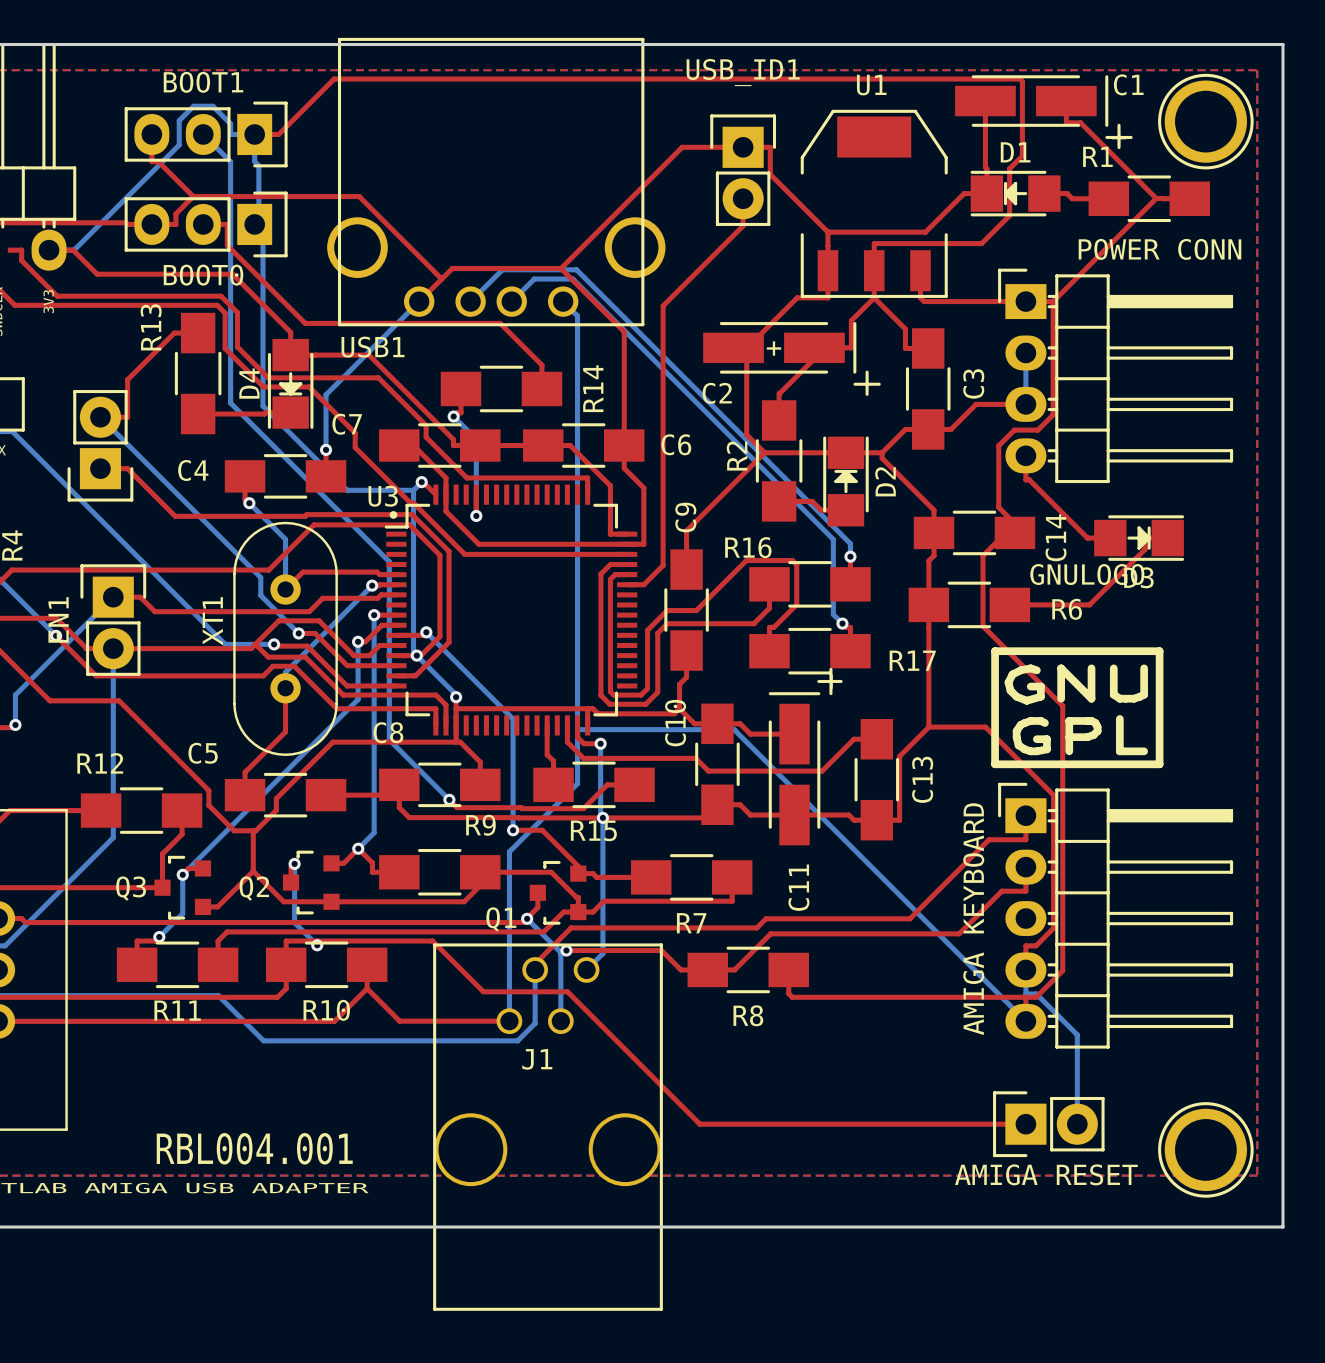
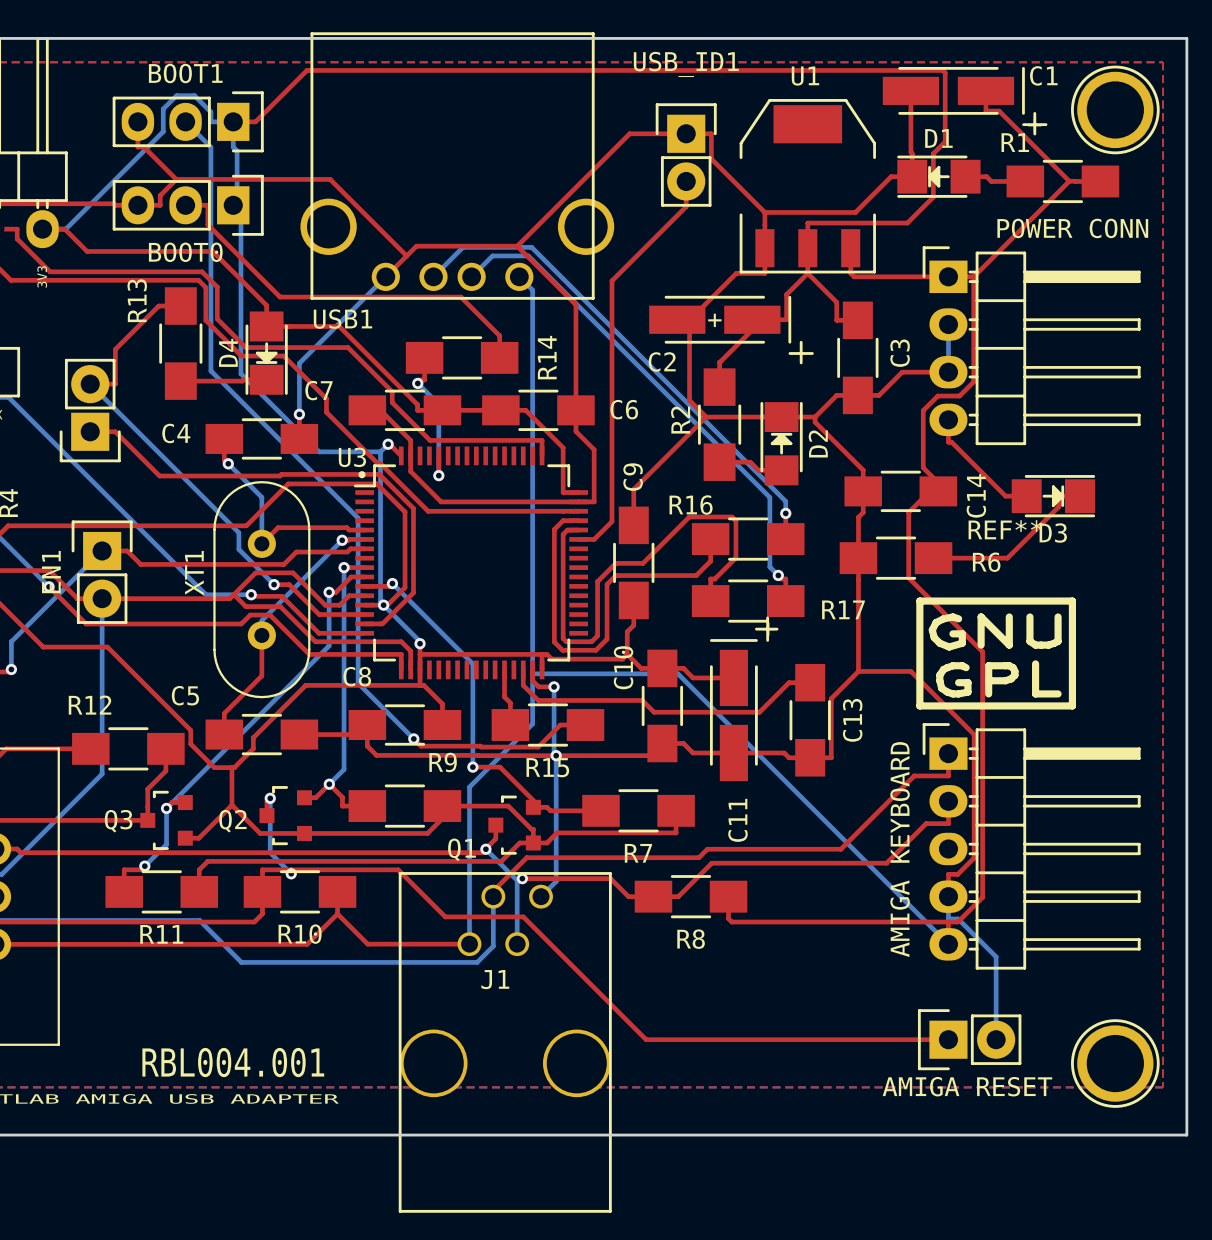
GNULOGO name: GNULOGO (1087, 574) -> REF** (1005, 529)

